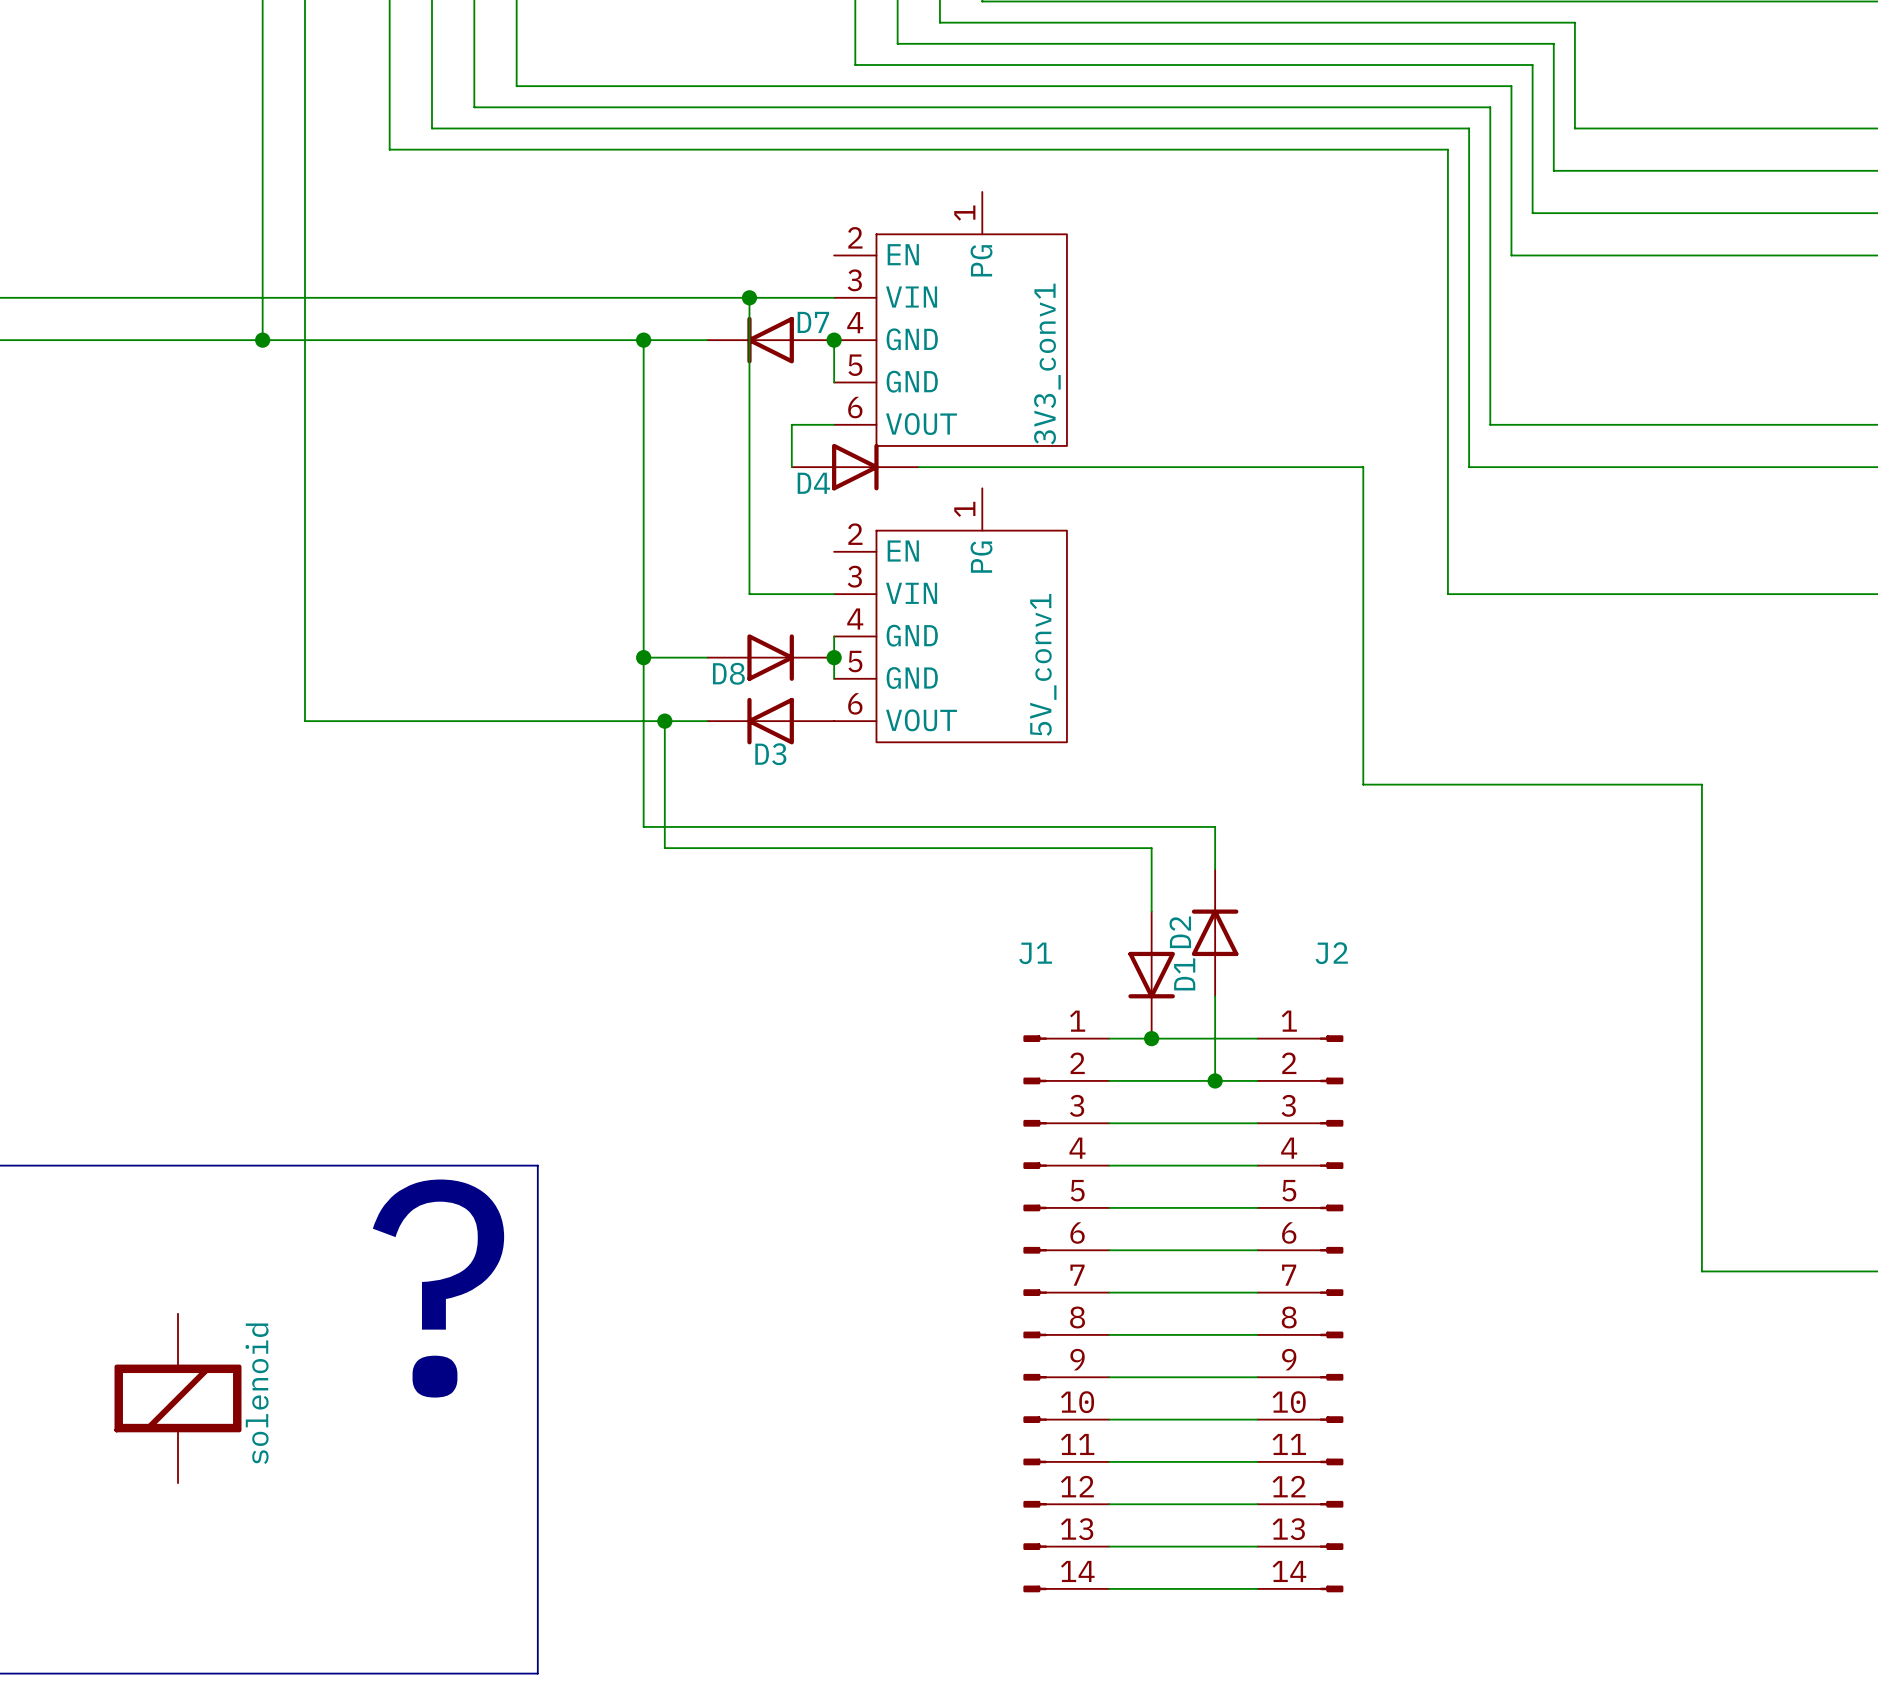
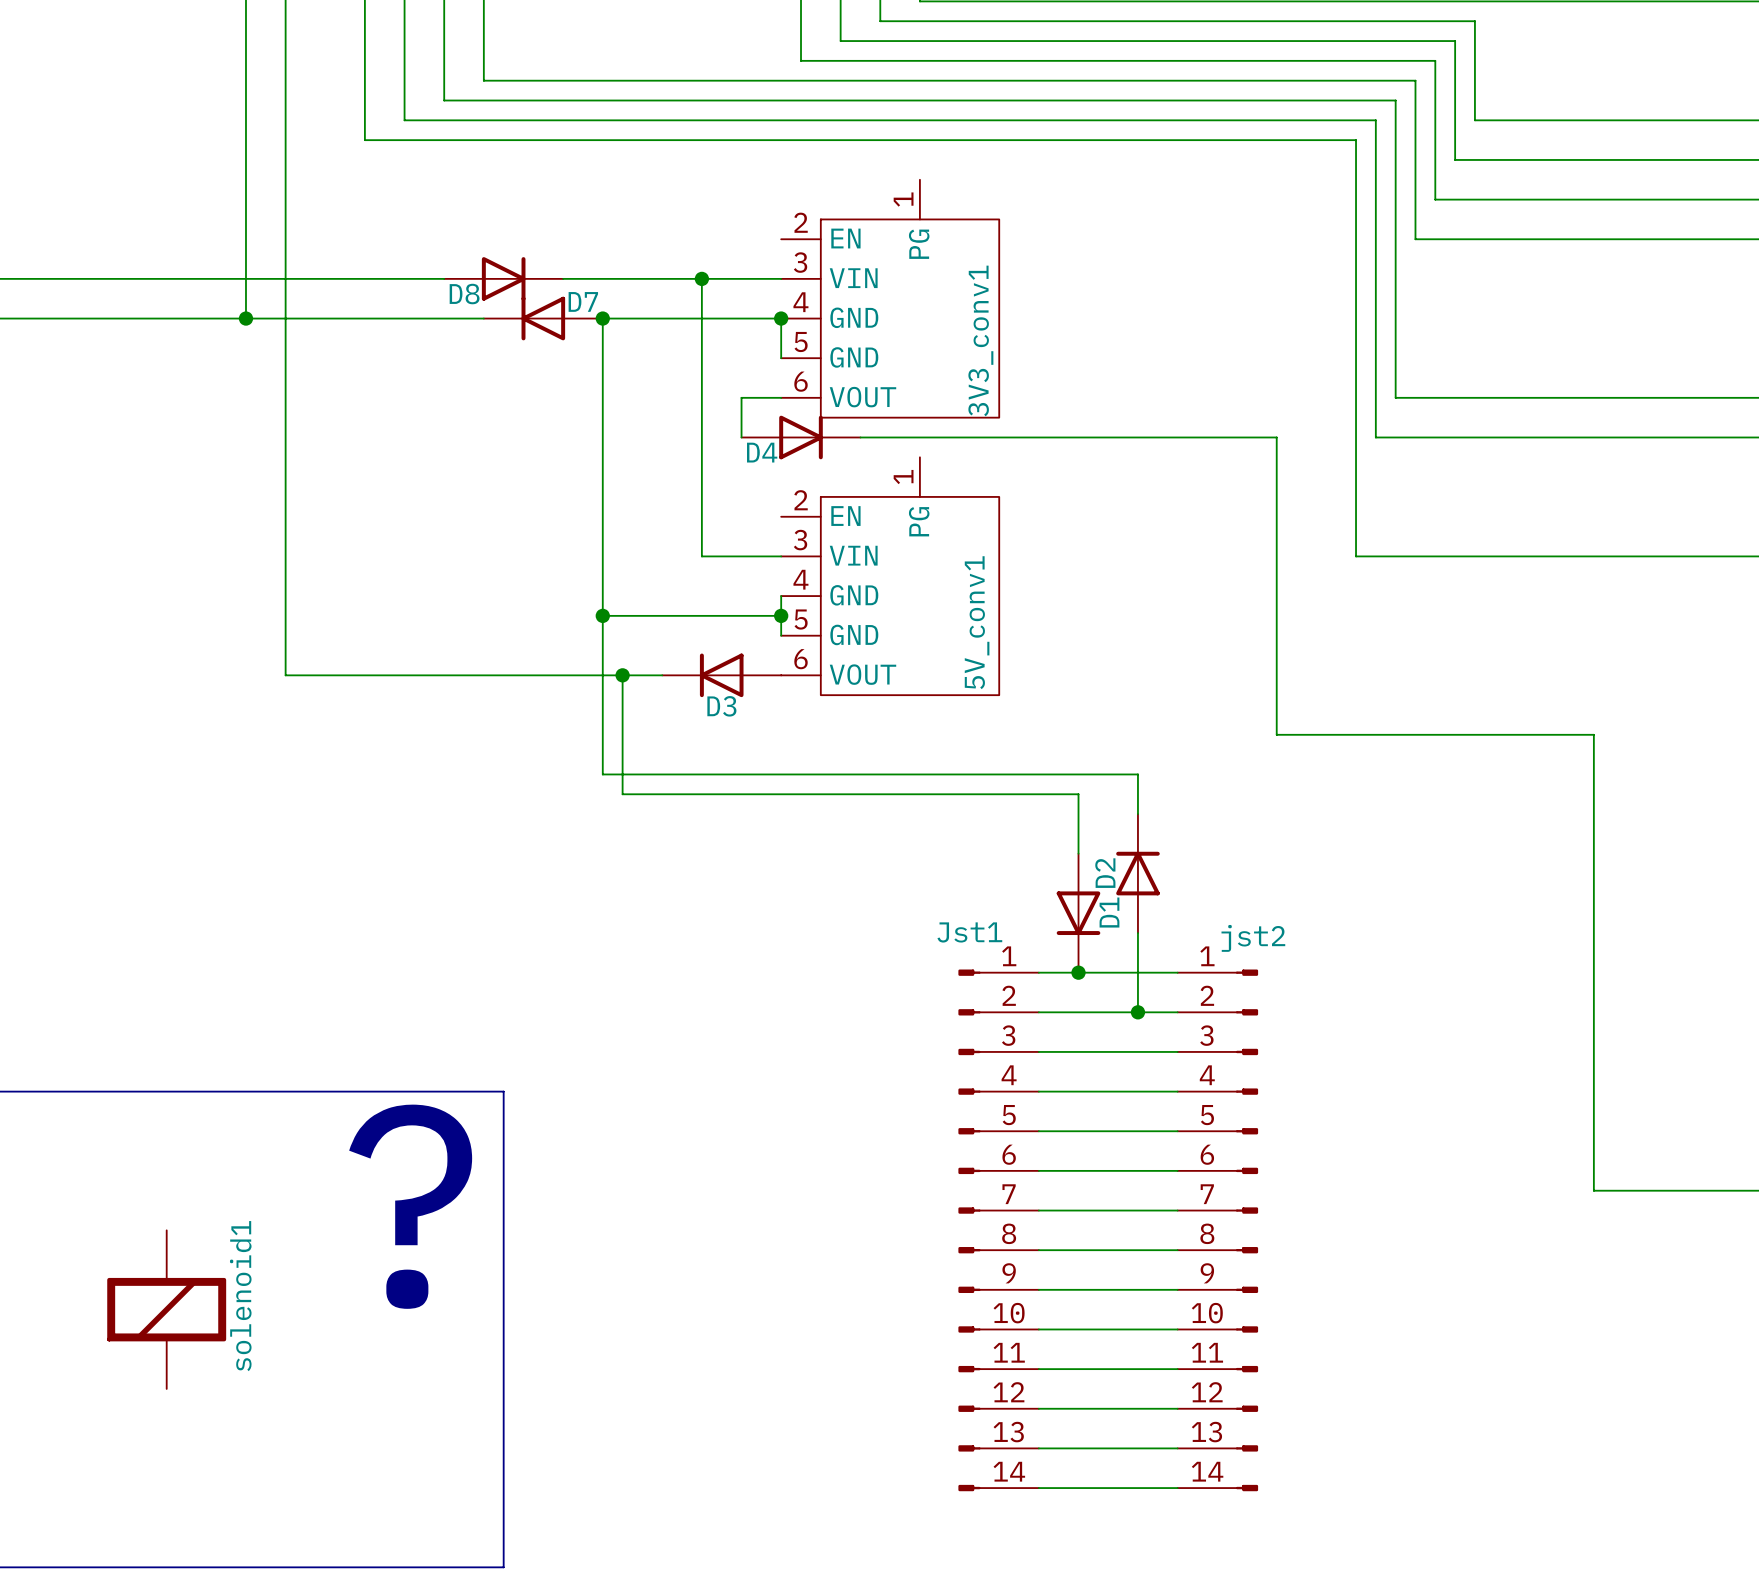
D7 position: (770, 340) -> (543, 318)
D8 position: (770, 657) -> (503, 278)
J1 name: J1 (1035, 953) -> Jst1 (969, 932)
J2 name: J2 (1331, 953) -> jst2 (1253, 938)
solenoid name: solenoid (257, 1393) -> solenoid1 (240, 1296)

